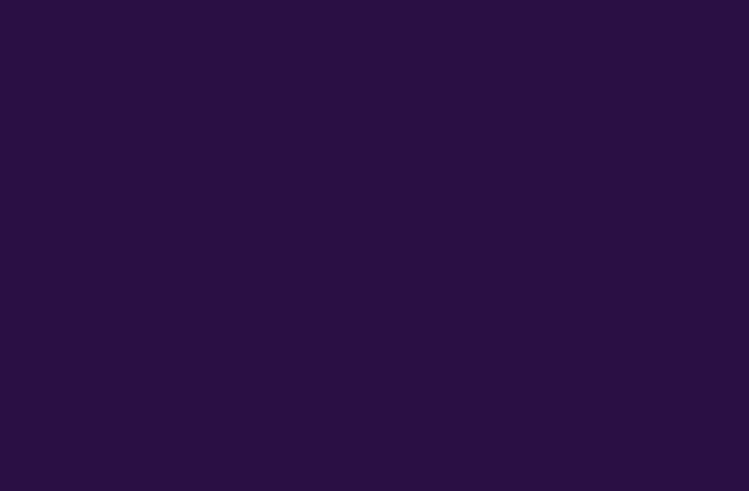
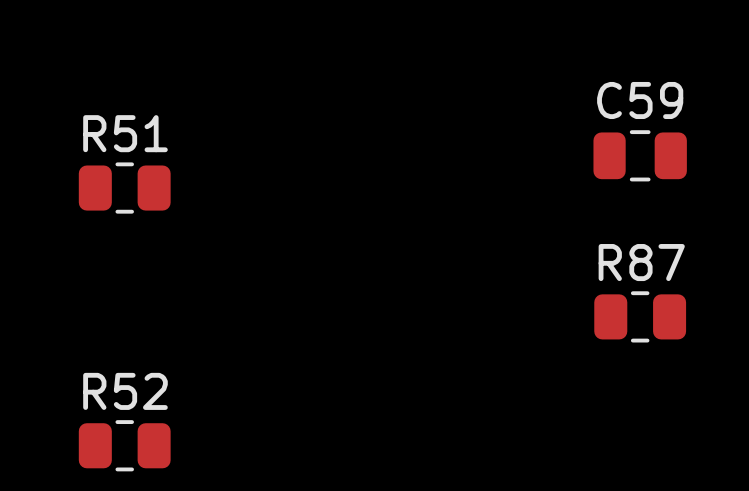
C59: none -> (640, 155)
R51: none -> (124, 188)
R87: none -> (640, 316)
R52: none -> (124, 445)

